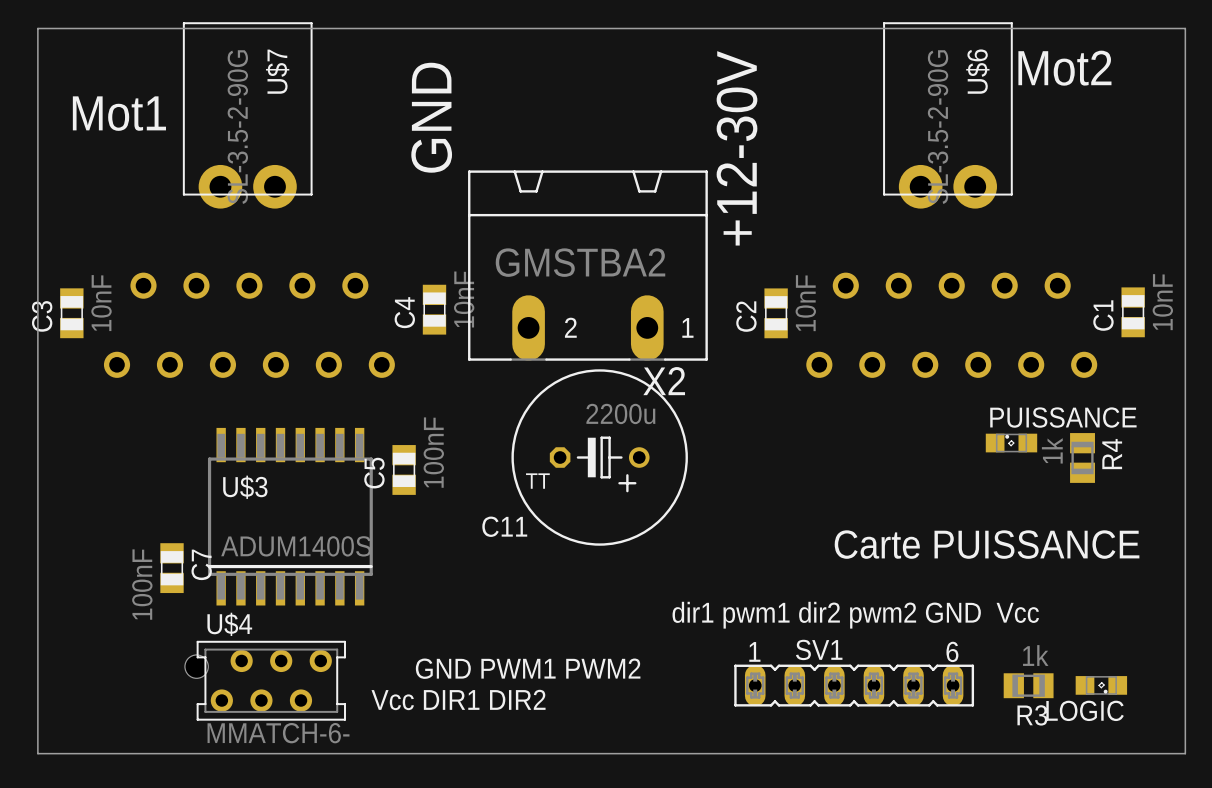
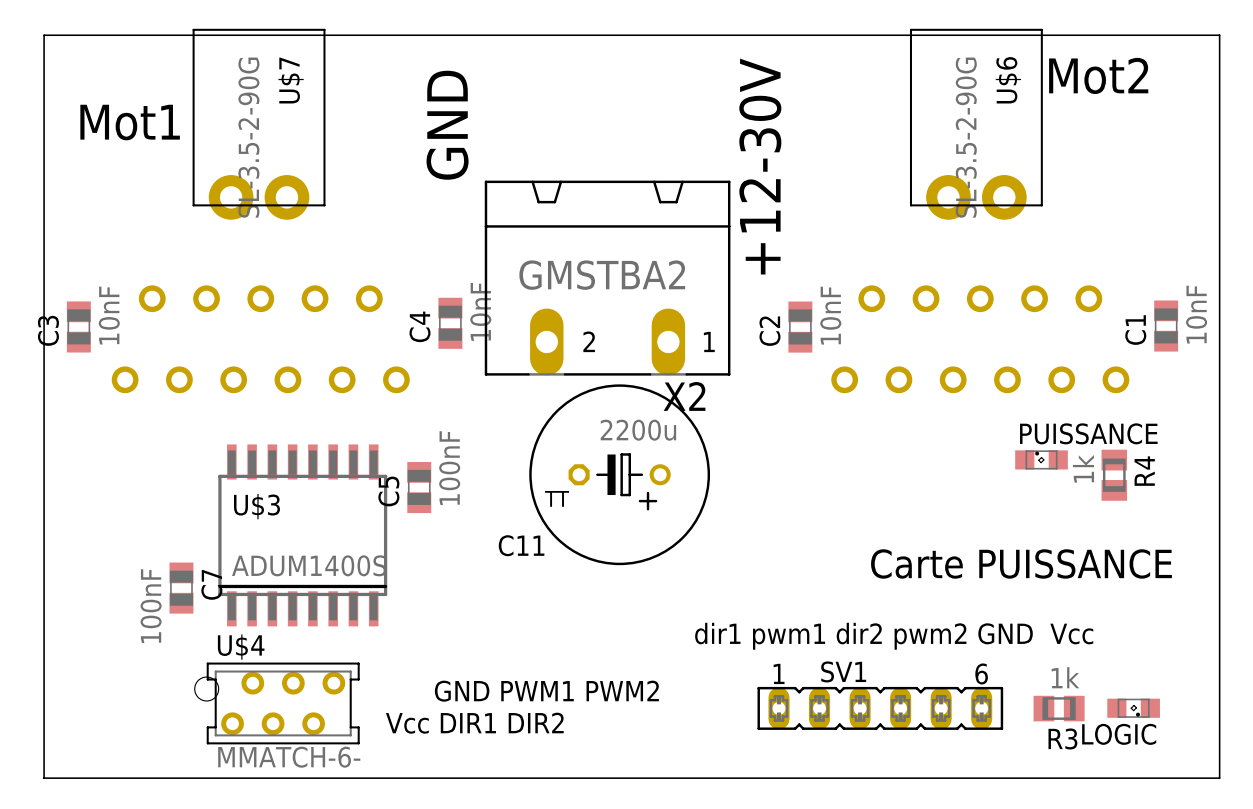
C4 footprint: [422, 284, 447, 335] -> [438, 297, 463, 349]
C1 footprint: [1121, 287, 1145, 338] -> [1154, 300, 1179, 352]
C3 footprint: [60, 288, 84, 339] -> [66, 301, 91, 353]
C2 footprint: [764, 288, 788, 339] -> [788, 301, 813, 353]
C5 footprint: [392, 445, 416, 495] -> [407, 461, 432, 514]
C7 footprint: [160, 543, 184, 594] -> [169, 562, 194, 614]

